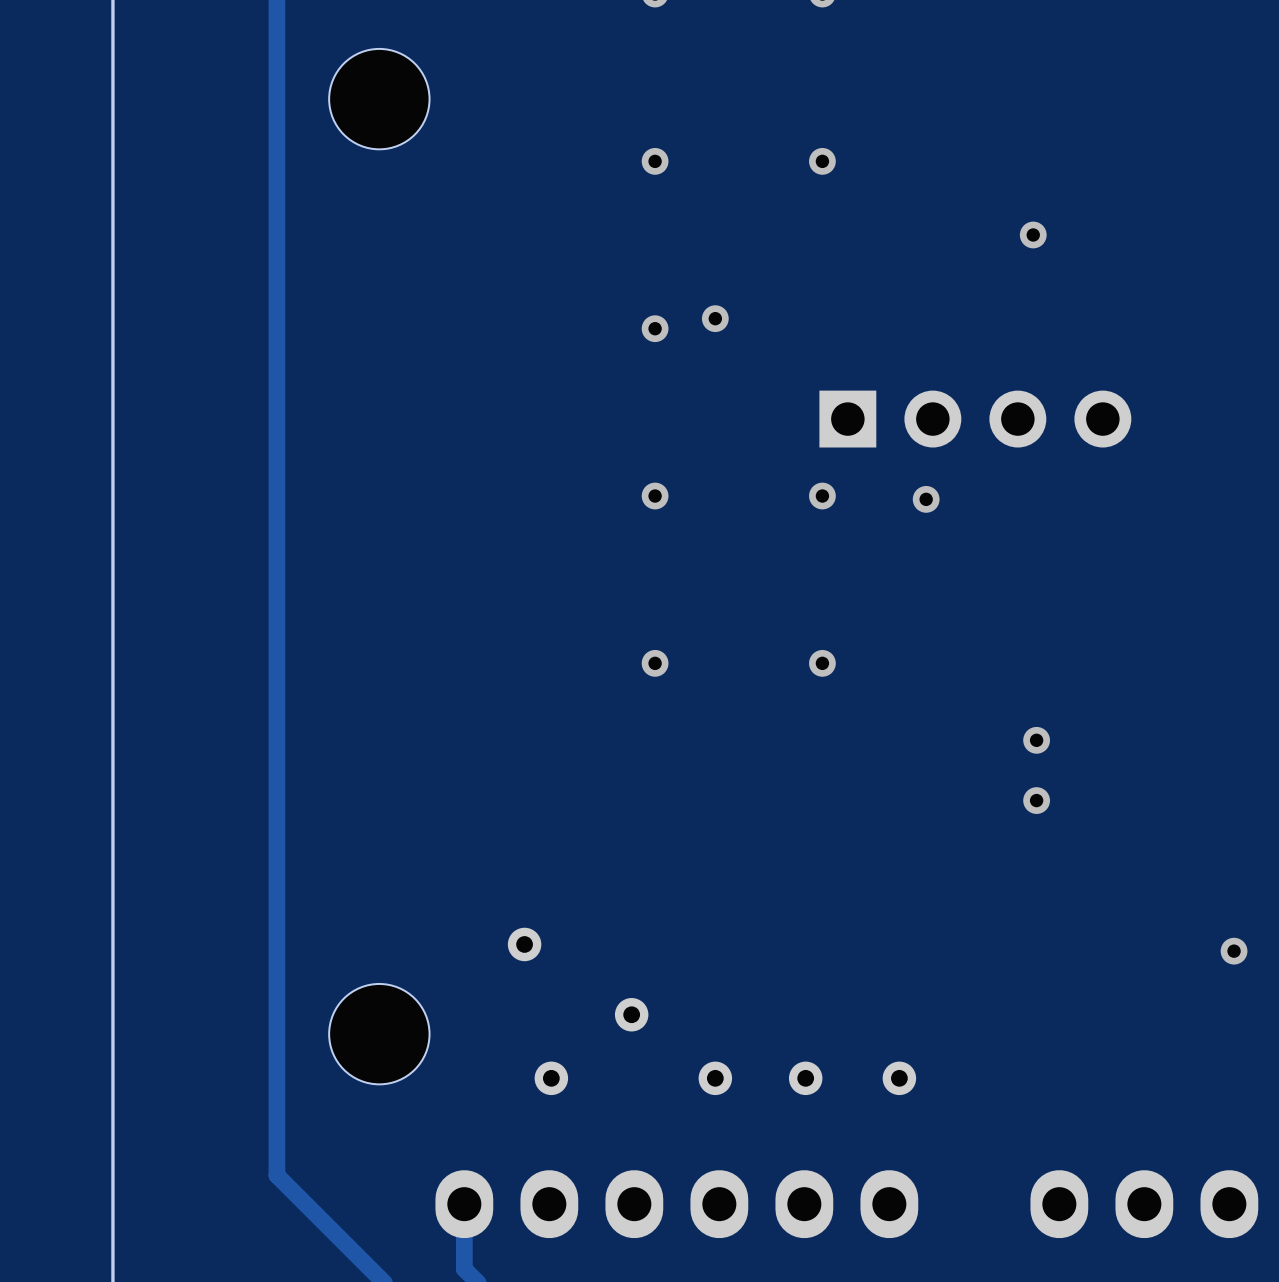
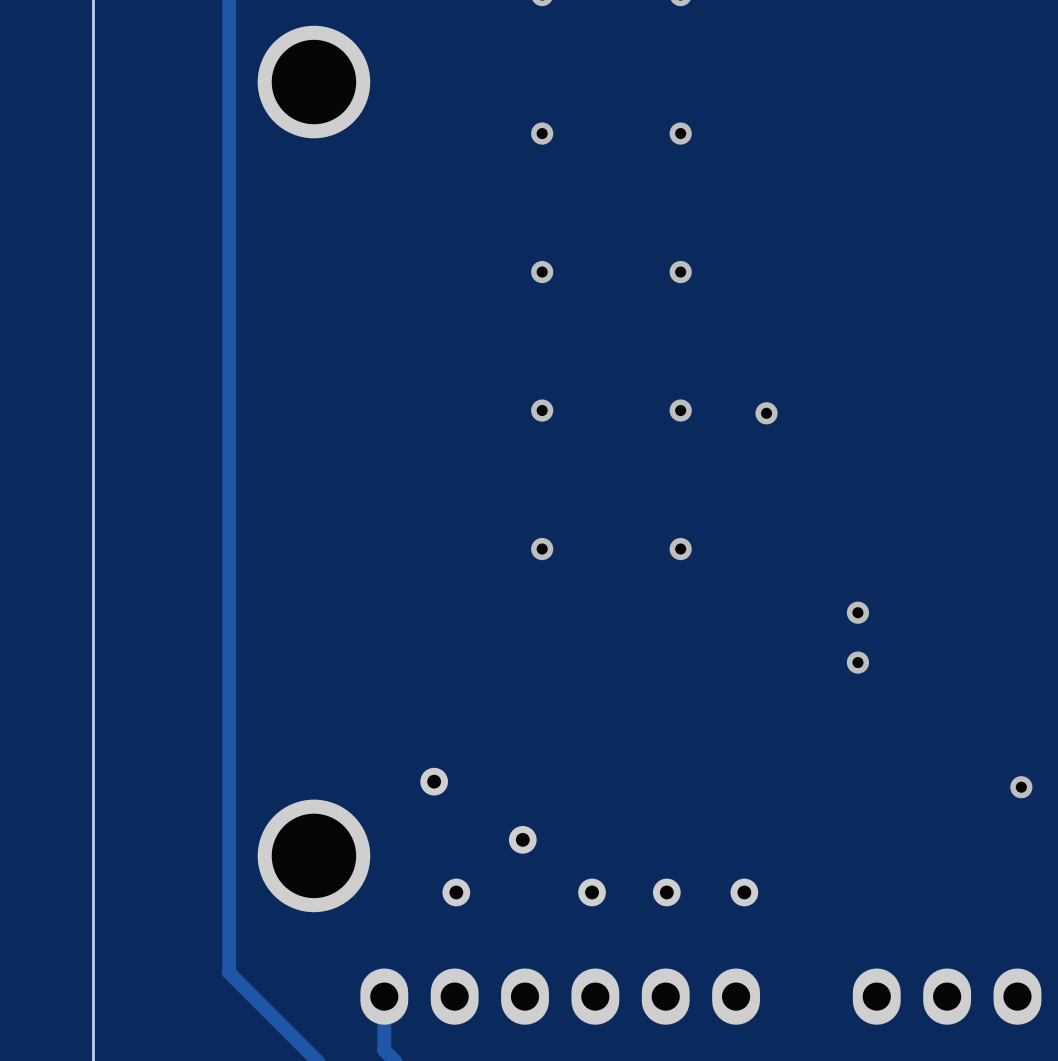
part footprint: [329, 48, 430, 150] -> [257, 25, 371, 139]
via: (1033, 234) -> none
via position: (715, 318) -> (680, 272)
part: (975, 419) -> none
part footprint: [329, 983, 430, 1085] -> [257, 799, 371, 913]

